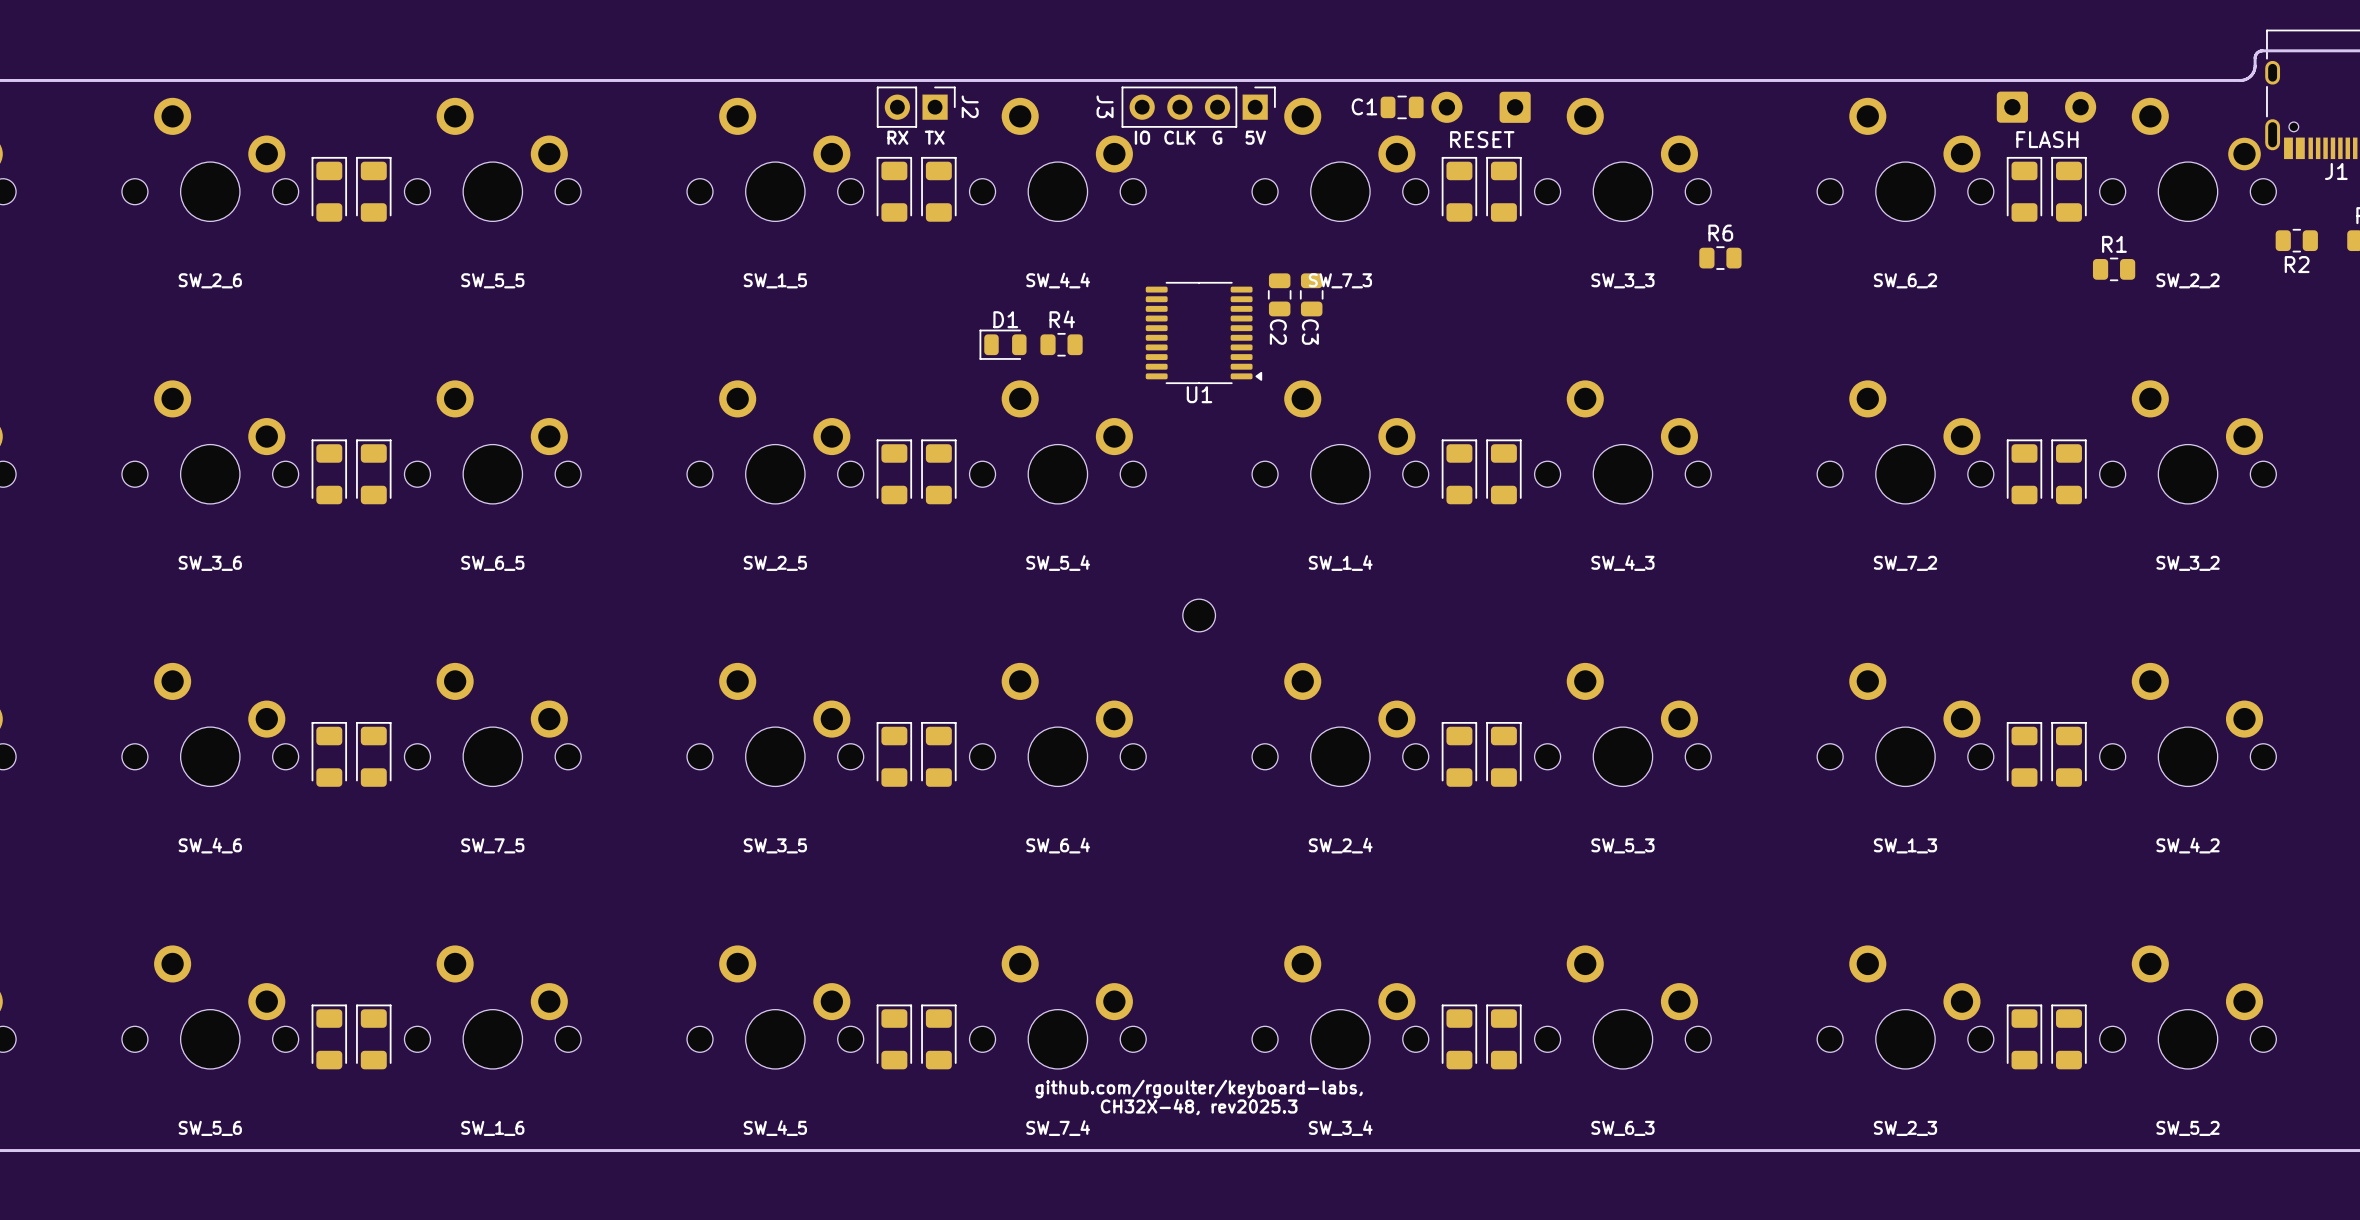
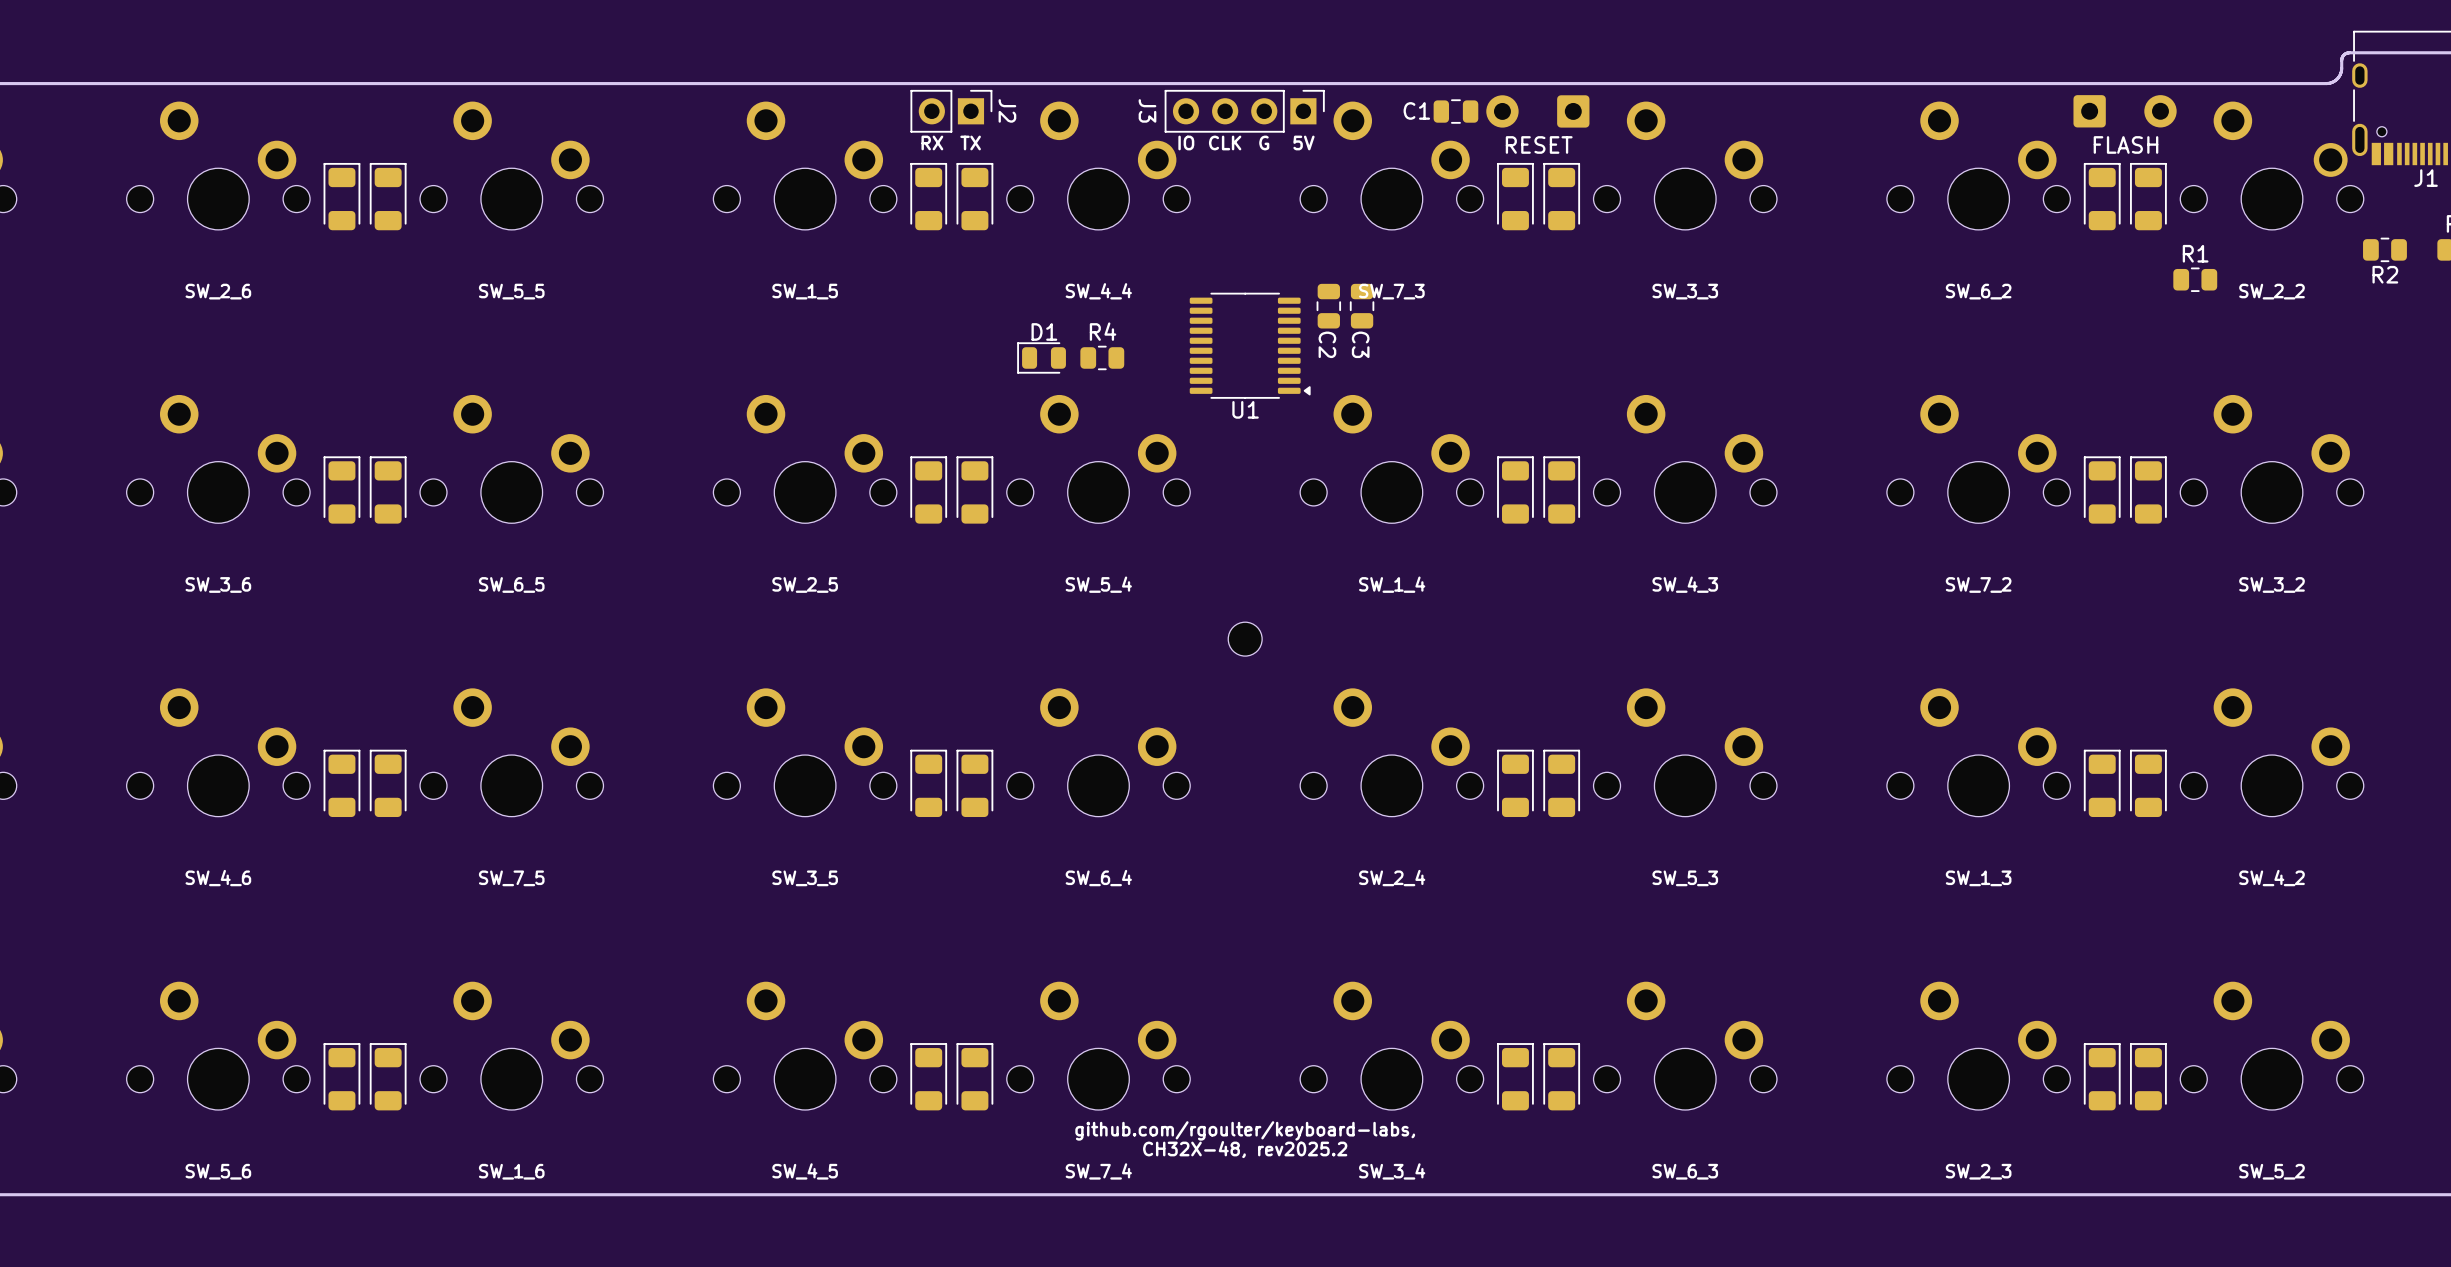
R6: (1720, 258) -> none
text: CH32X-48, rev2025.3 (1199, 1107) -> CH32X-48, rev2025.2 (1245, 1149)

